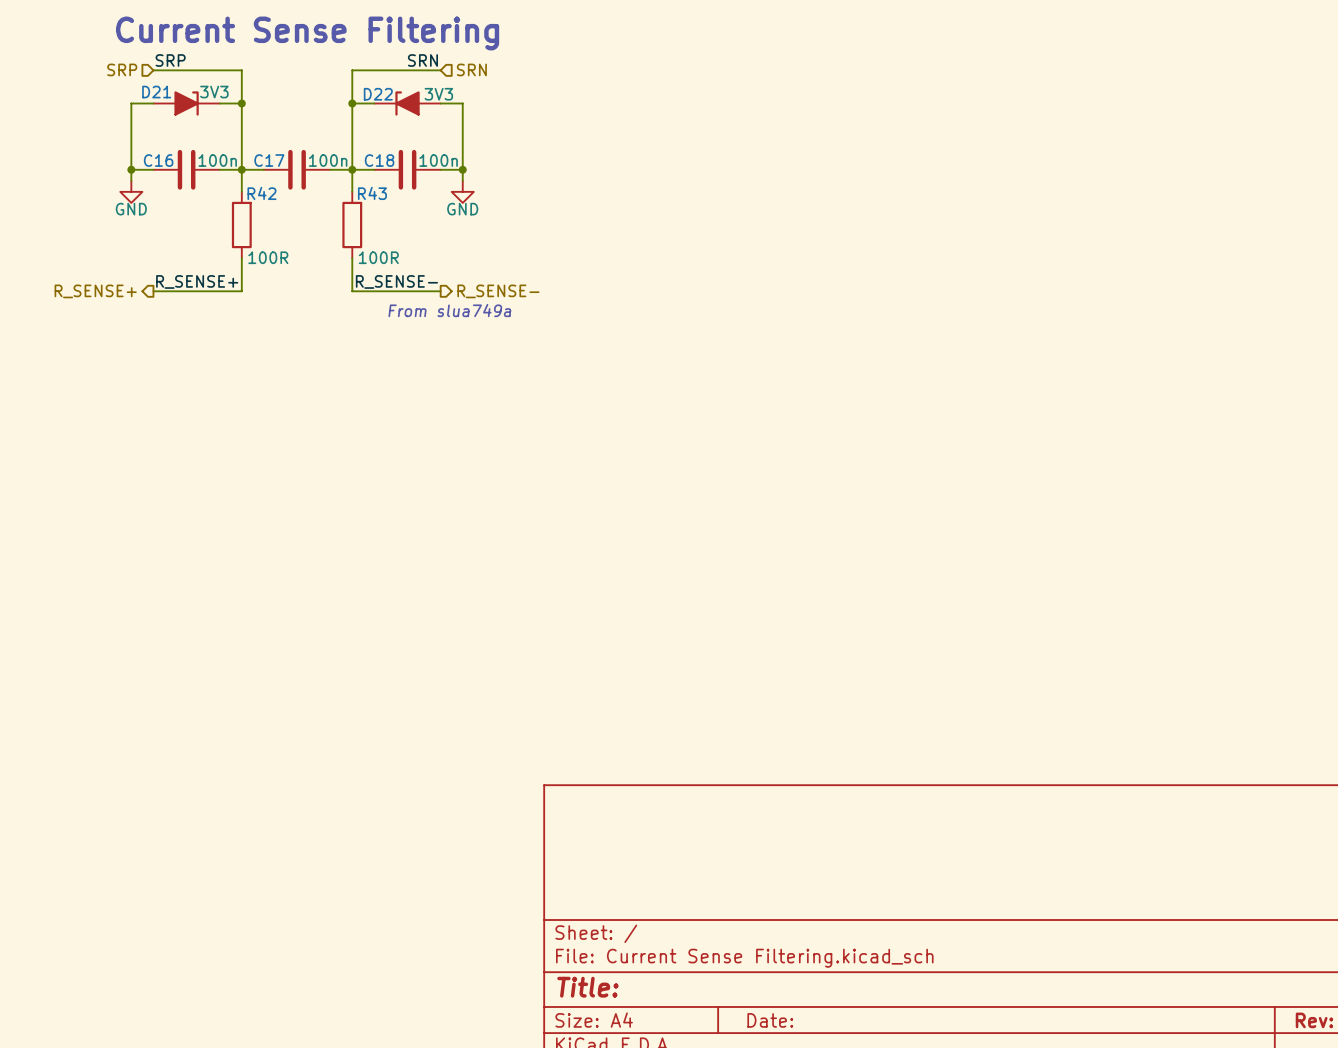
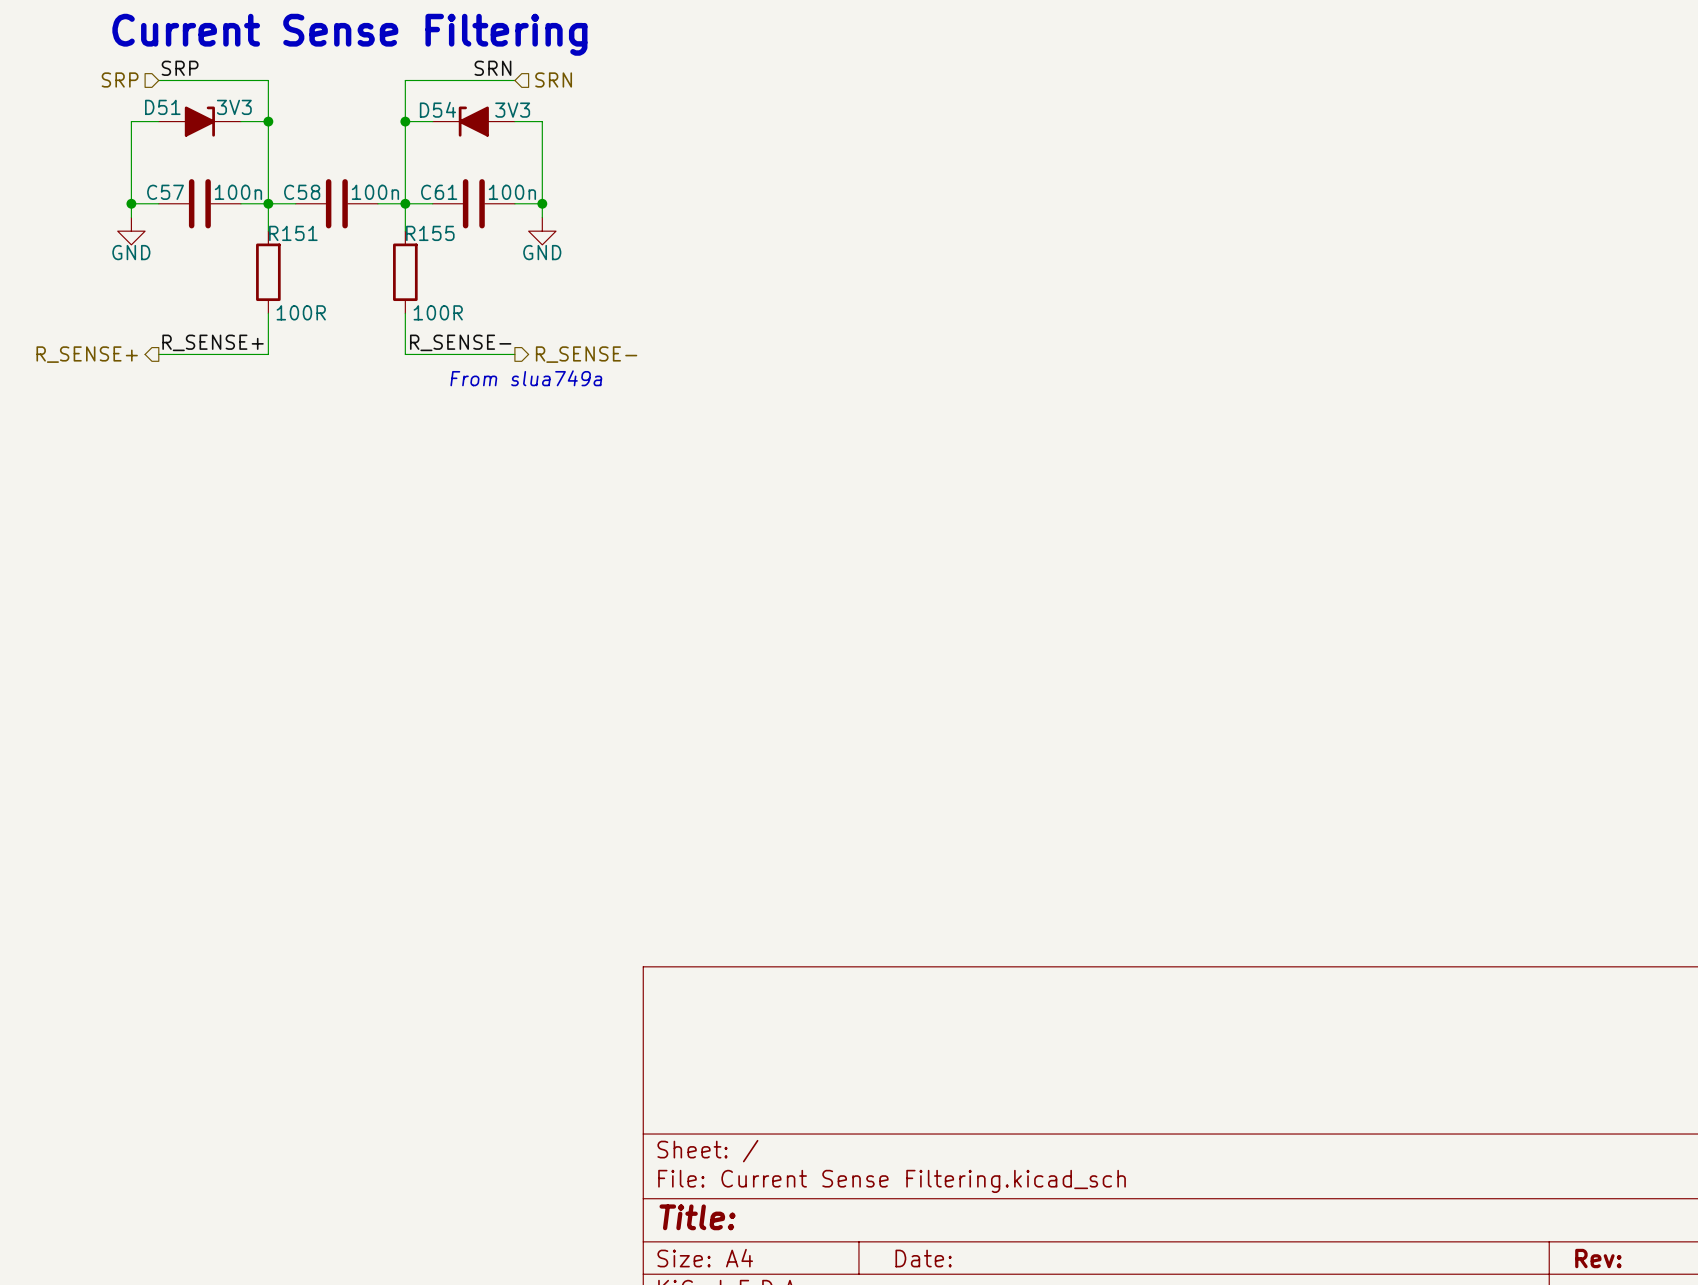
D21 name: D21 (156, 92) -> D51 (162, 107)
D22 name: D22 (378, 94) -> D54 (437, 109)
C16 name: C16 (158, 160) -> C57 (165, 192)
C17 name: C17 (269, 160) -> C58 (302, 192)
C18 name: C18 (379, 160) -> C61 (439, 192)
R42 name: R42 (261, 193) -> R151 (293, 233)
R43 name: R43 (372, 193) -> R155 (430, 233)

